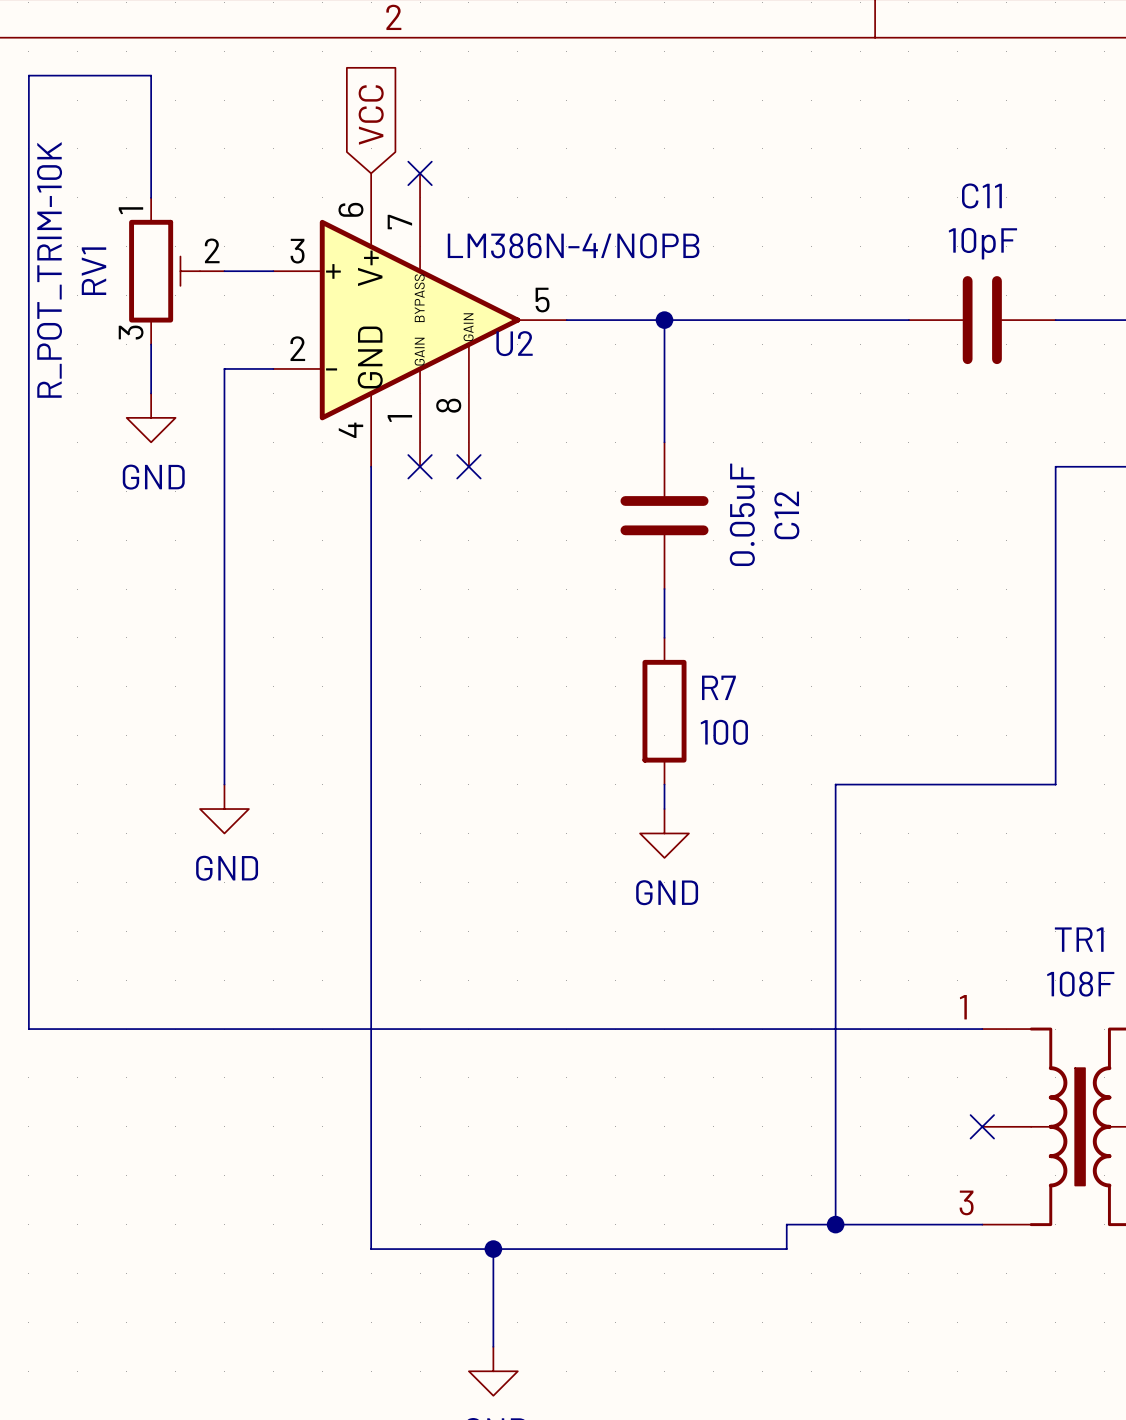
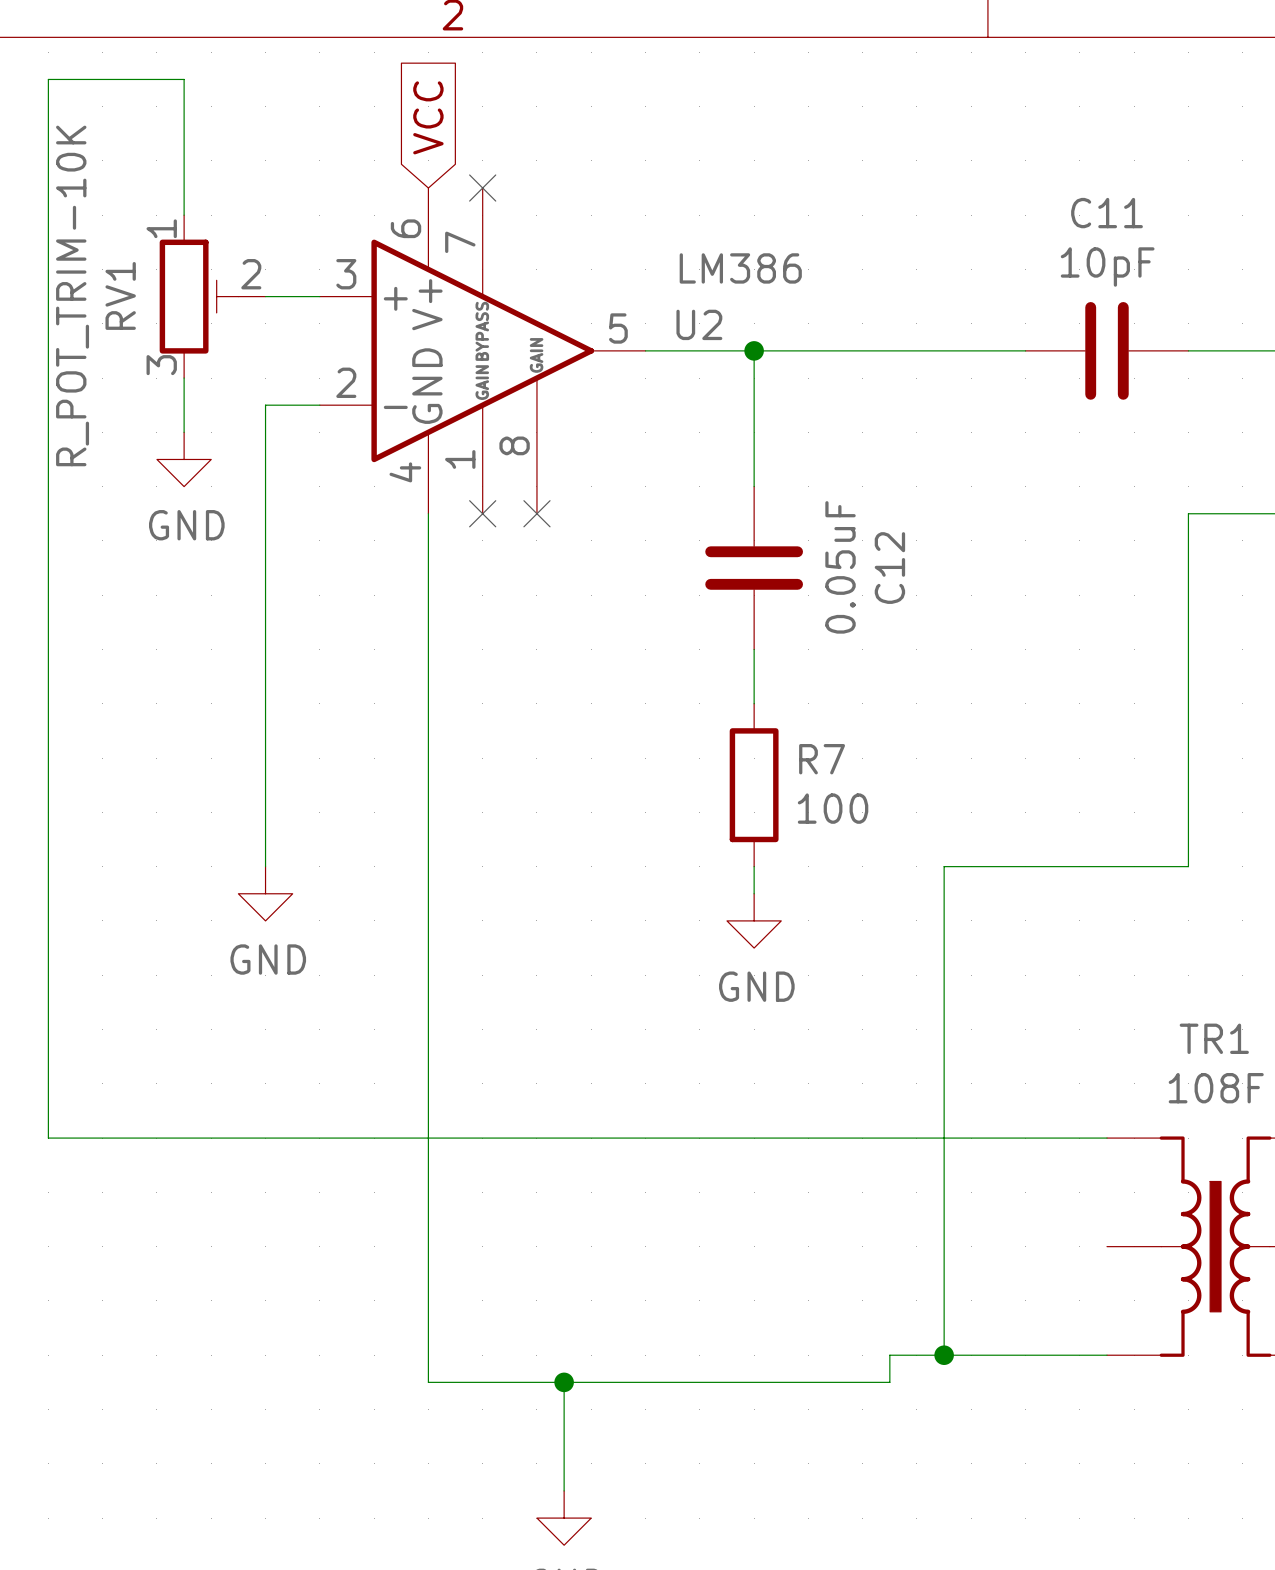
U2 value: LM386N-4/NOPB (573, 245) -> LM386 (740, 268)
U2 name position: U2 (514, 343) -> U2 (699, 324)
label: 1 (963, 1007) -> none
no-connect mark: (982, 1126) -> none
label: 3 (966, 1202) -> none

